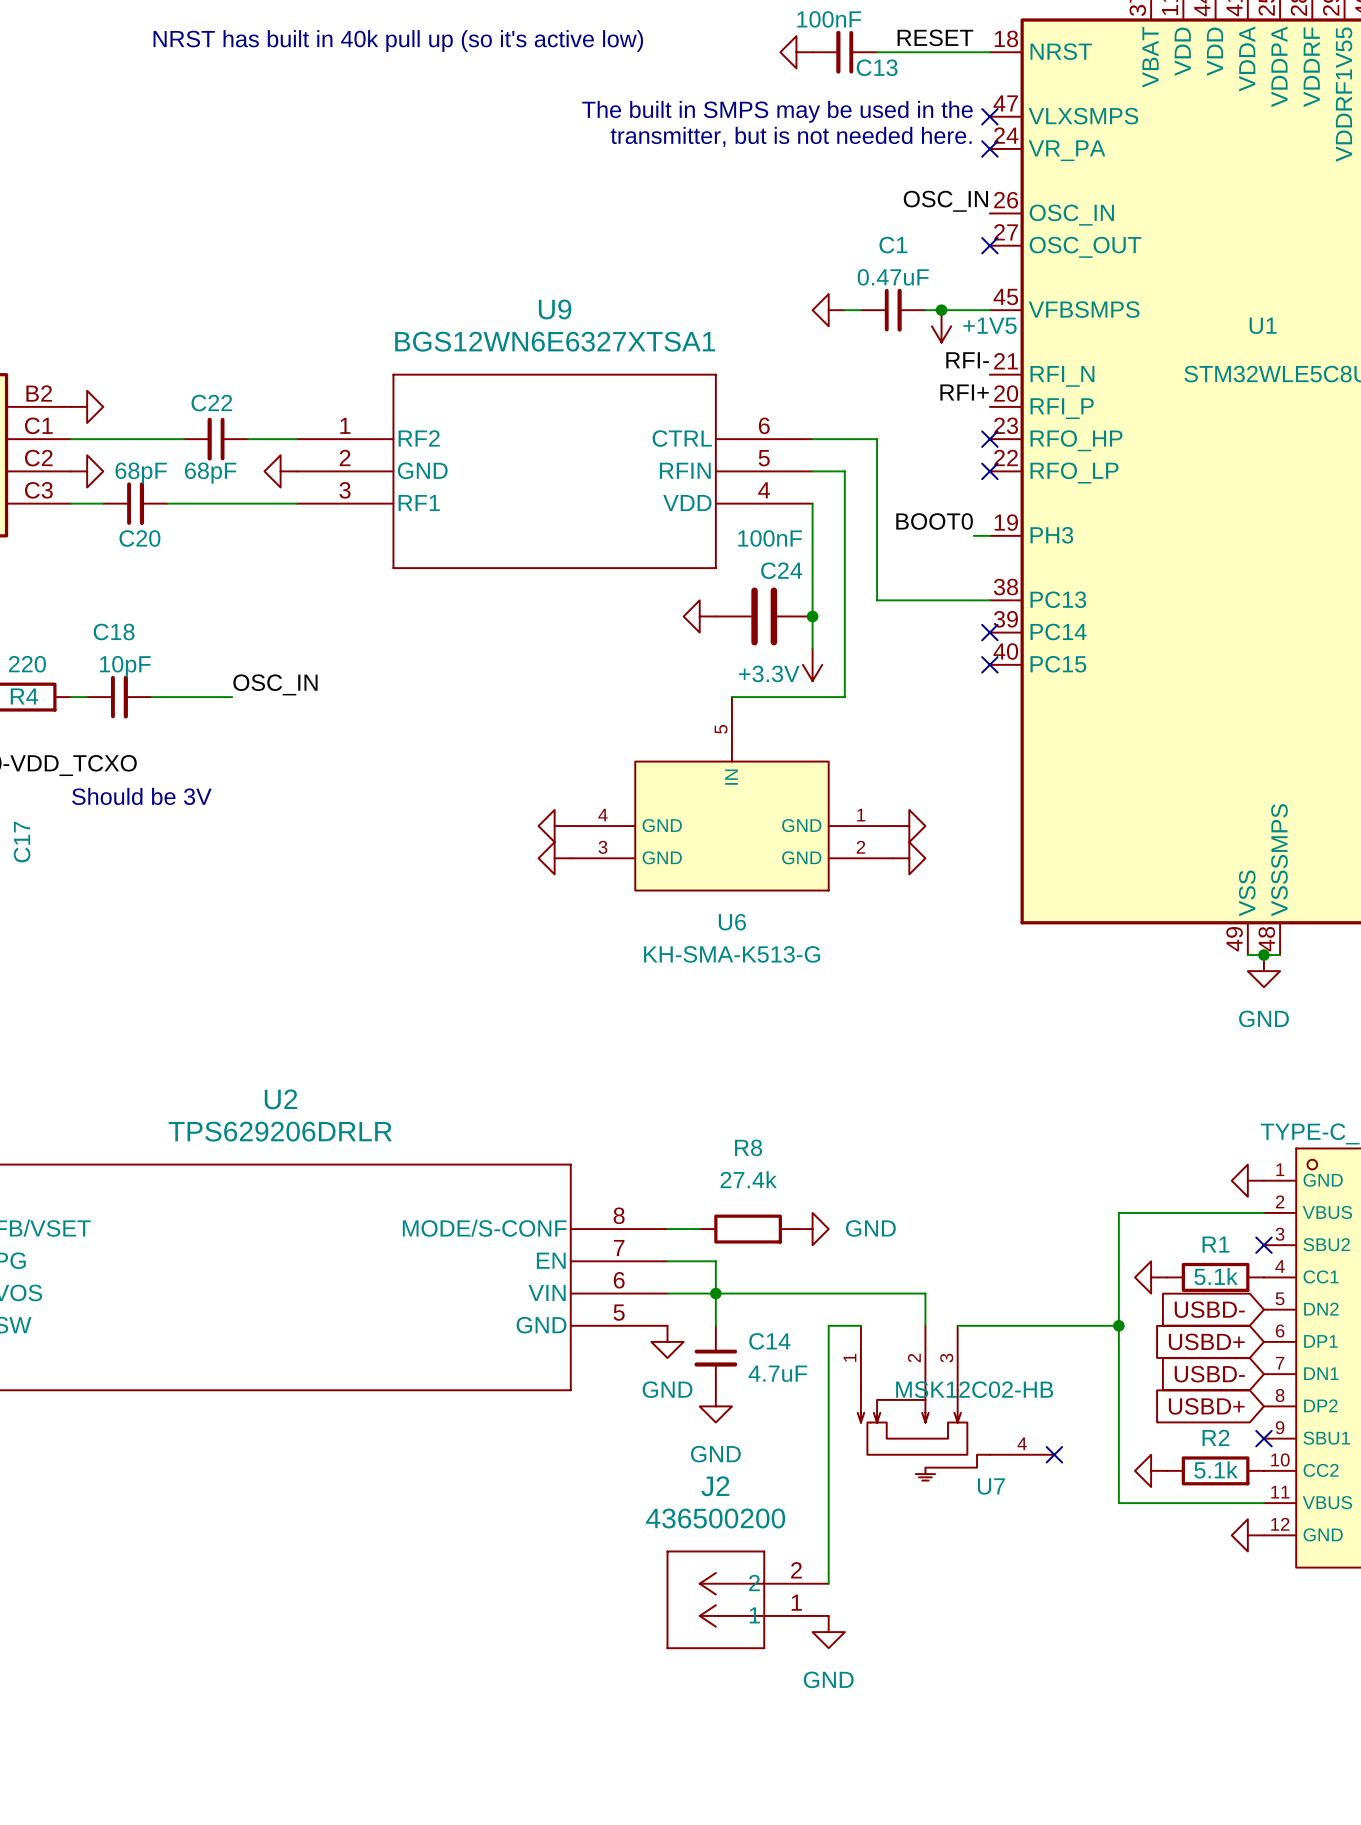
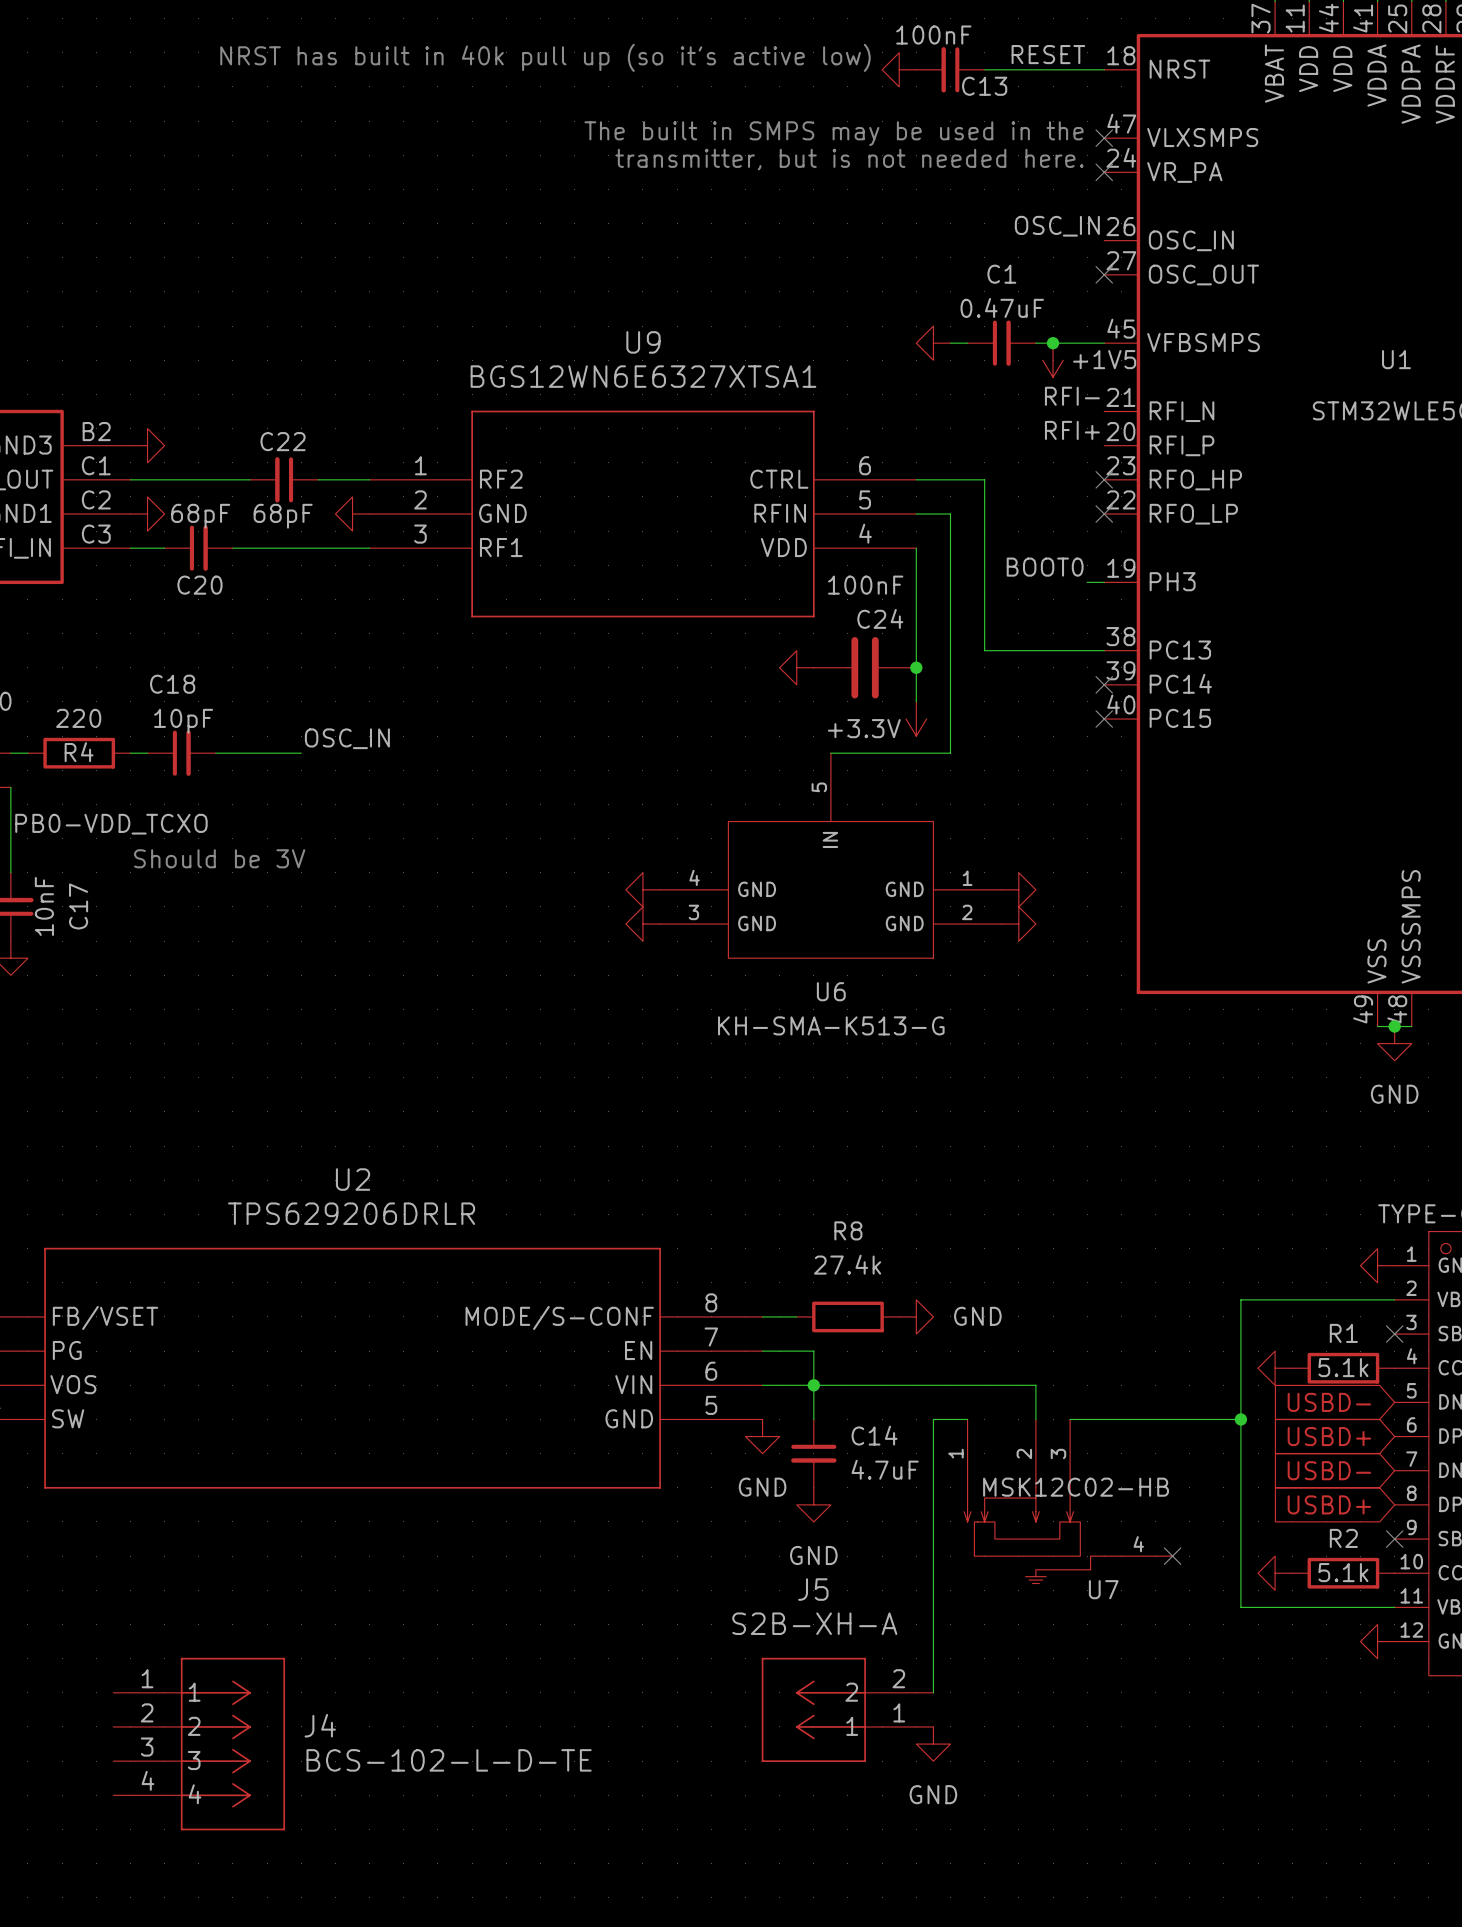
J2 name: J2 (715, 1486) -> J5 (813, 1589)
J2 value: 436500200 (715, 1518) -> S2B-XH-A (814, 1623)
J4: none -> BCS-102-L-D-TE (199, 1744)

